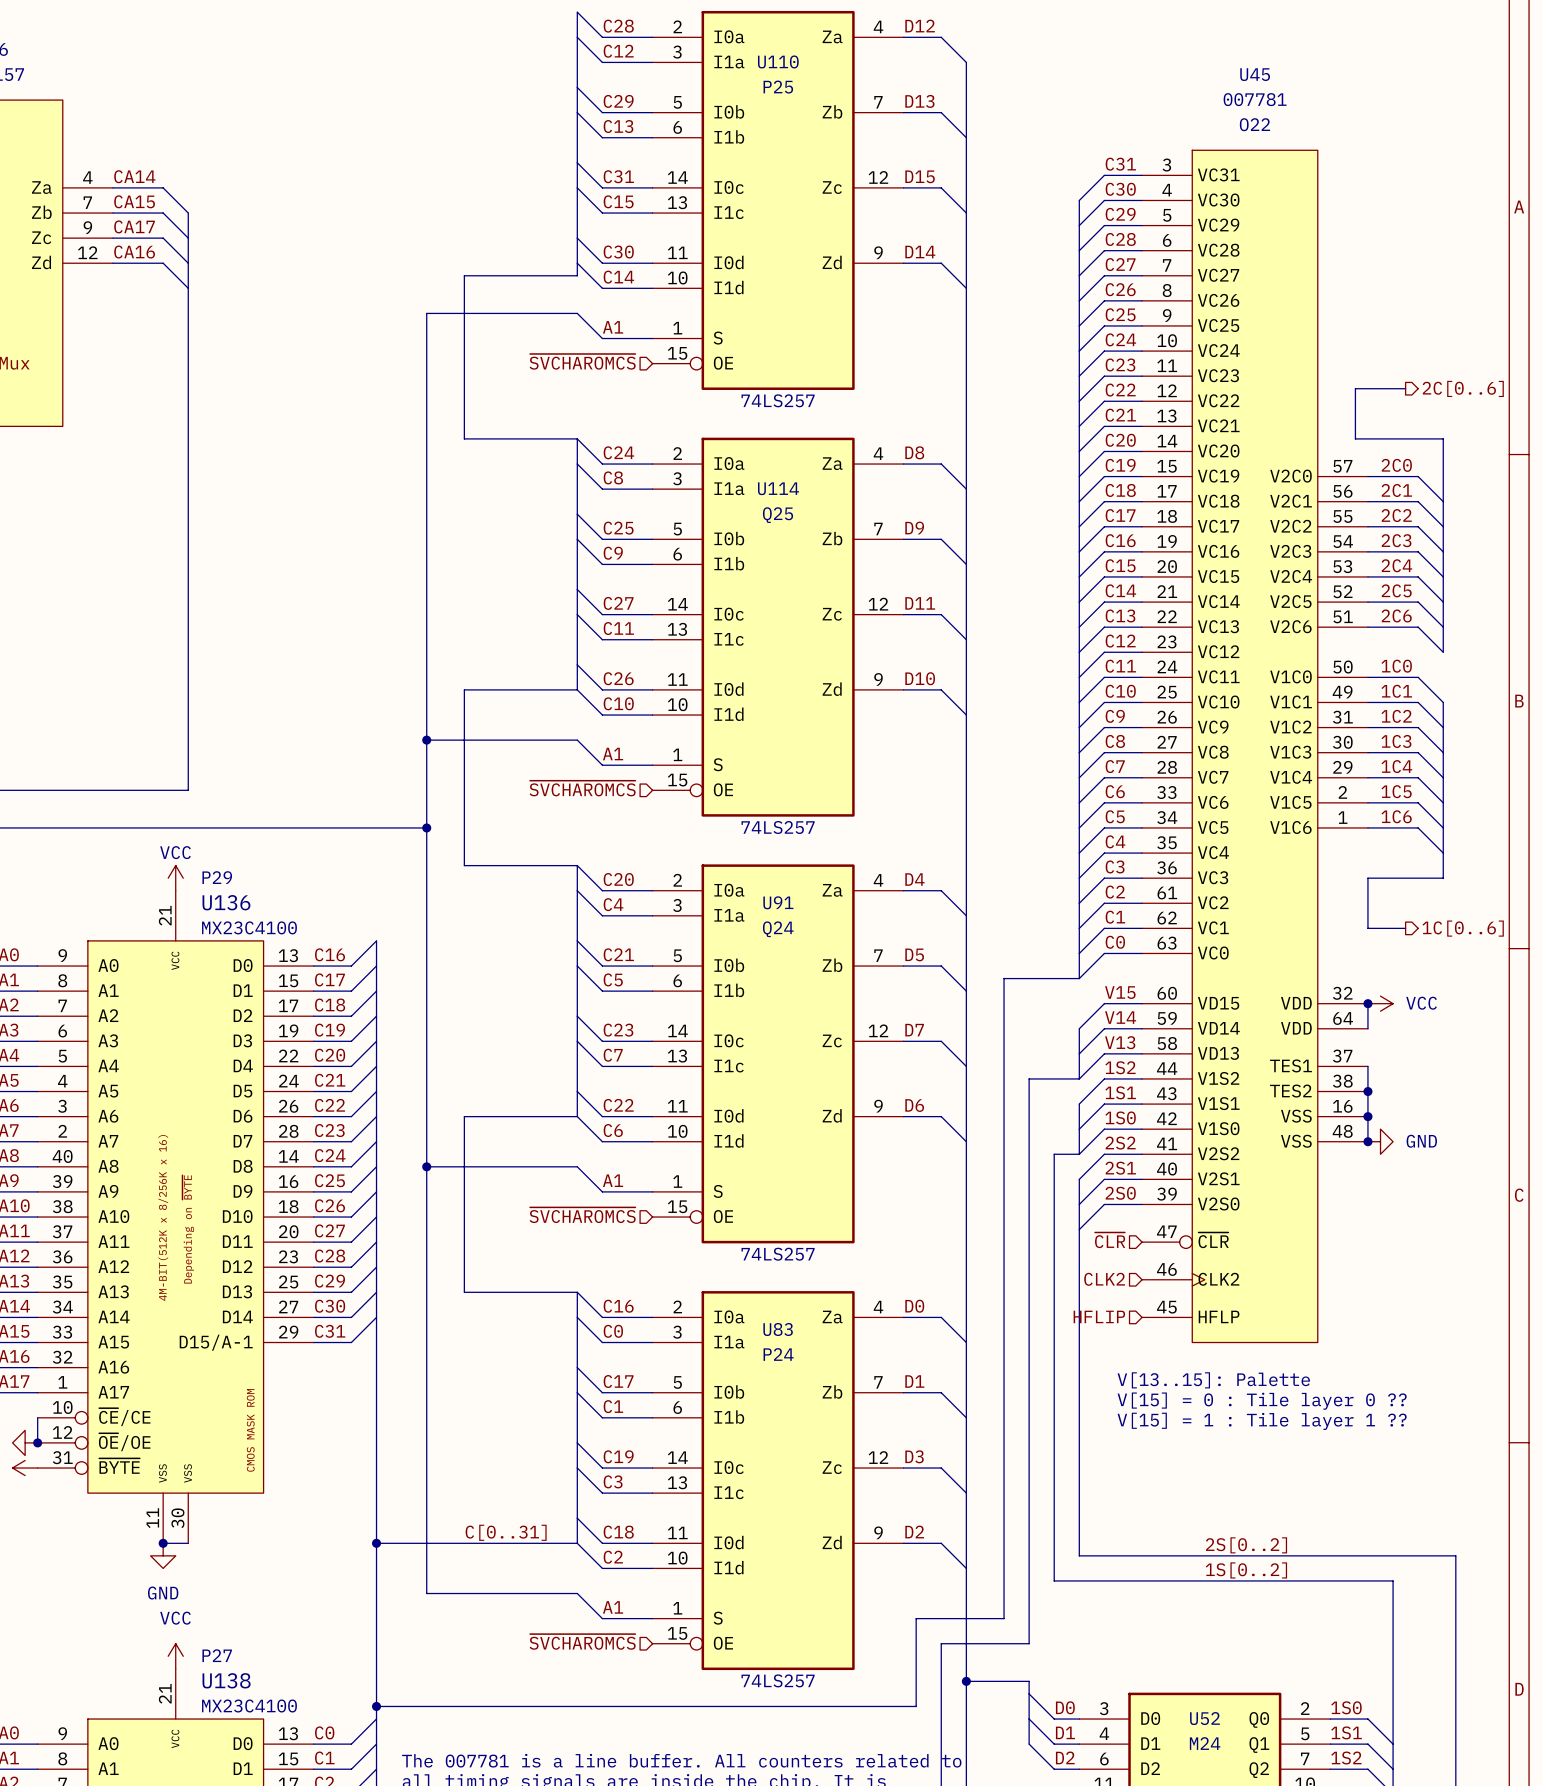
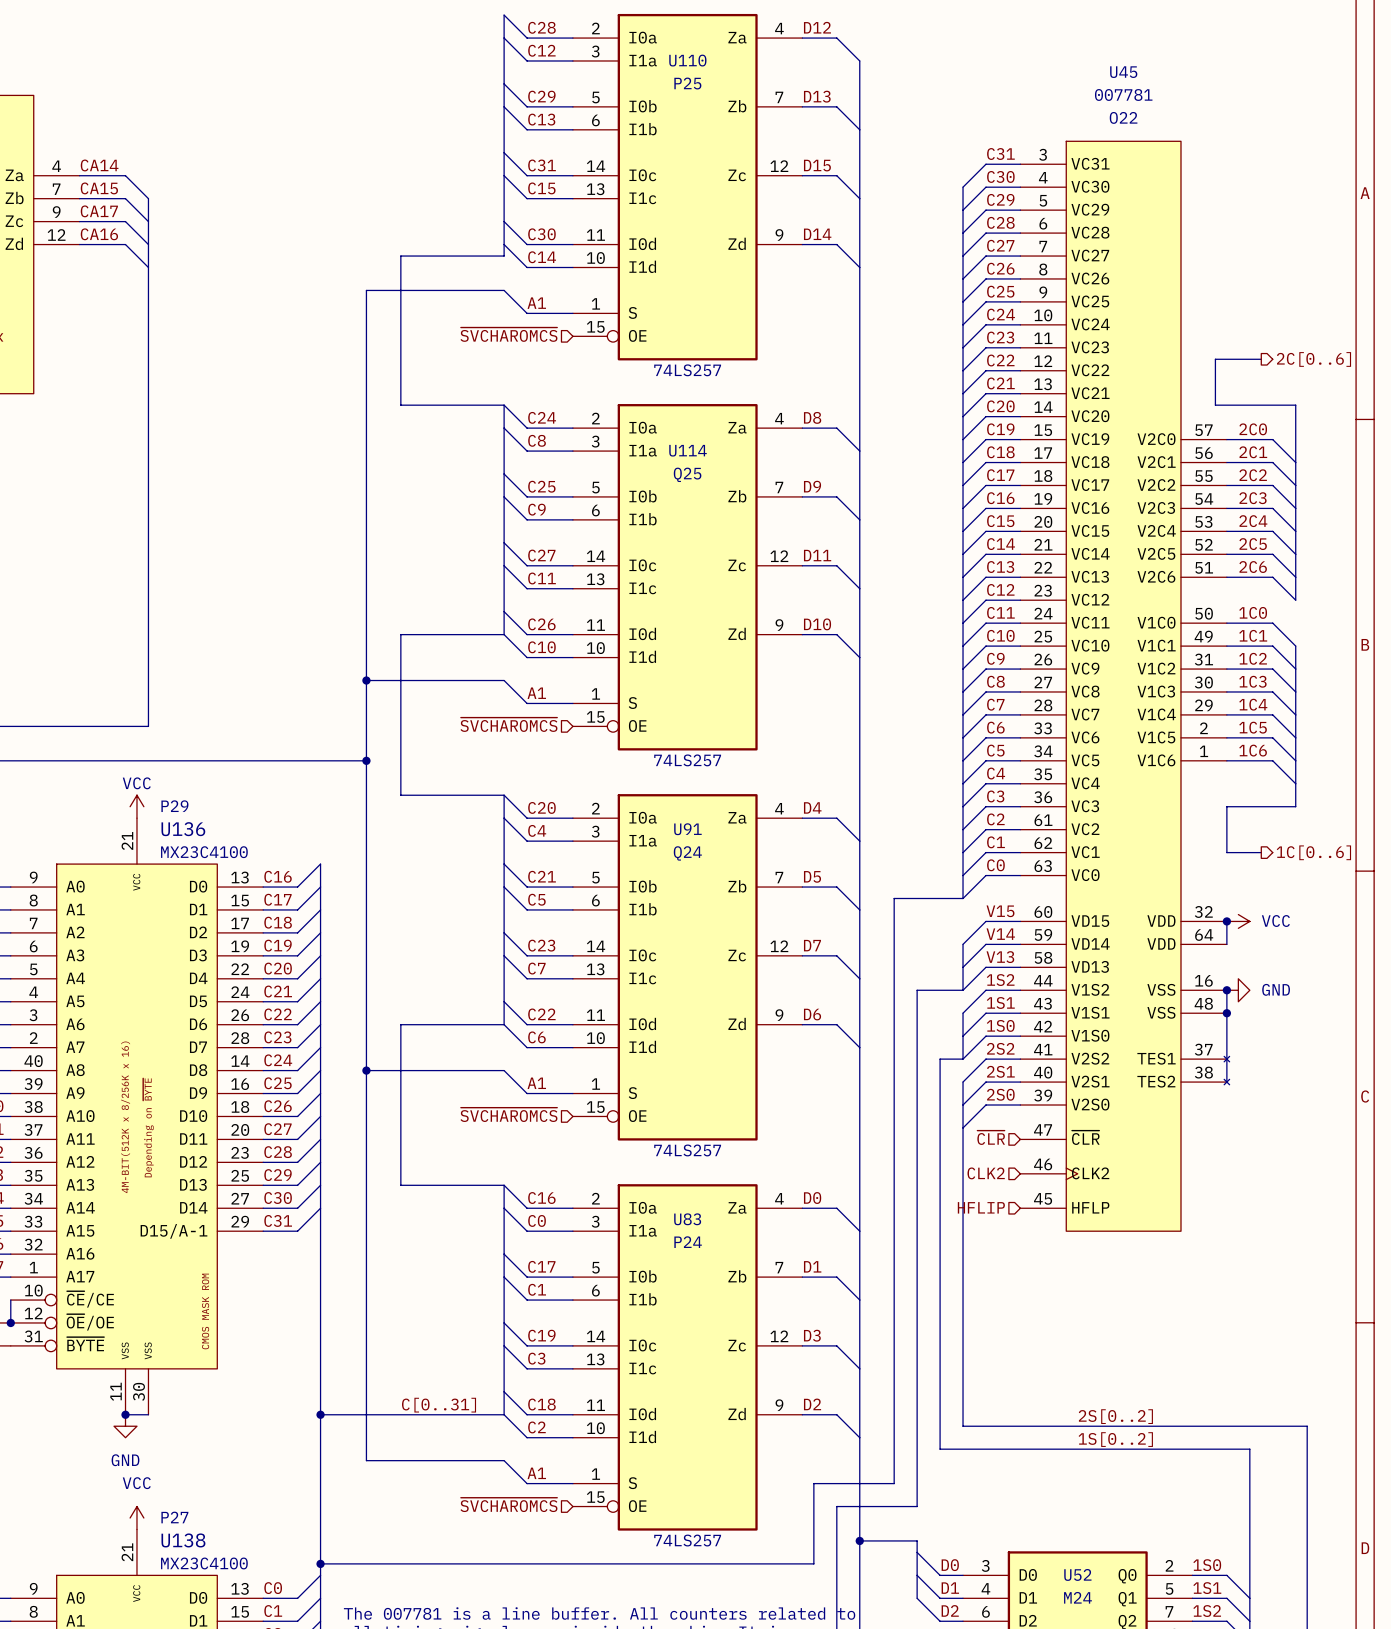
U45 symbol: [1142, 150, 1368, 1343] -> [1020, 141, 1230, 1232]
wire: (1367, 1066) (1367, 1078) -> none
junction: none -> (1226, 990)
junction: (1367, 1091) -> none
junction: none -> (1226, 1013)
junction: (1367, 1116) -> none
wire: none -> (1226, 1047) (1226, 1082)
junction: (1367, 1141) -> none
power symbol position: GND (1380, 1141) -> GND (1238, 990)
text: V[13..15]: Palette (1213, 1380) -> none
text: V[15] = 0 : Tile layer 0 ?? (1262, 1401) -> none
text: V[15] = 1 : Tile layer 1 ?? (1262, 1421) -> none

